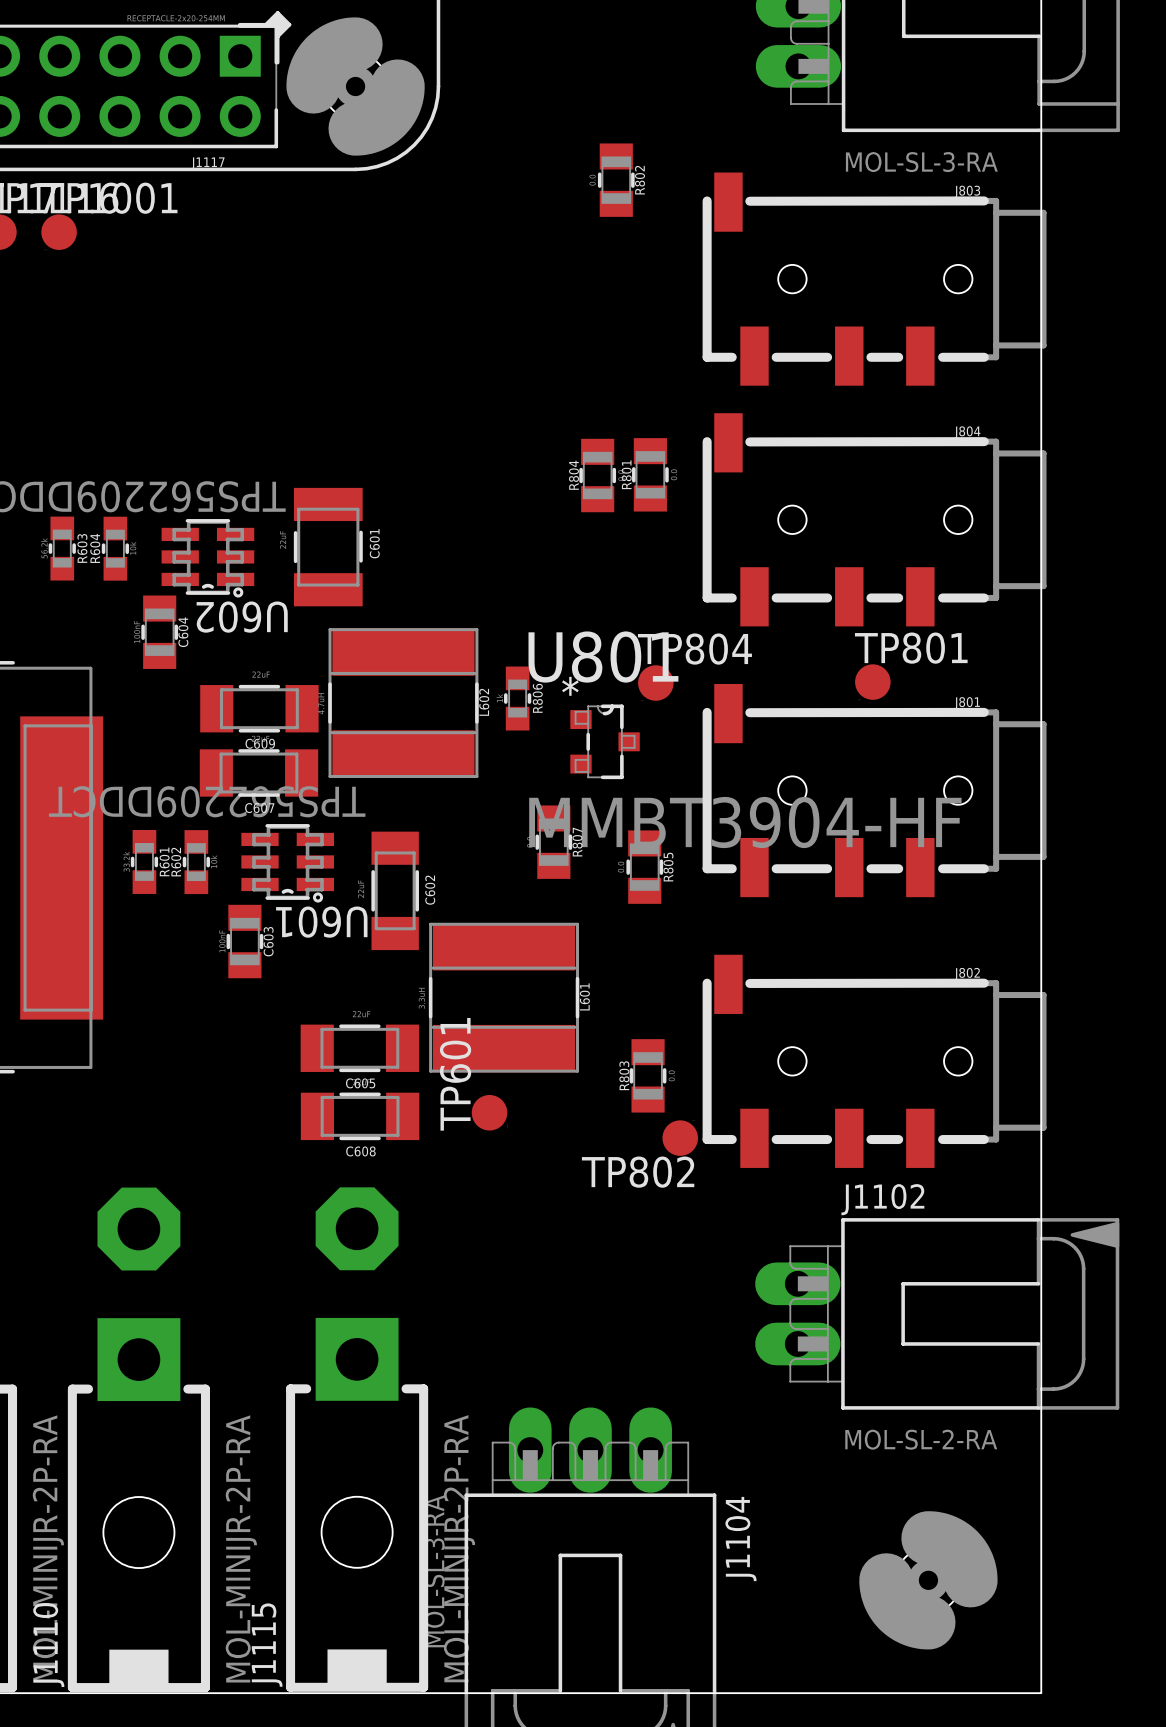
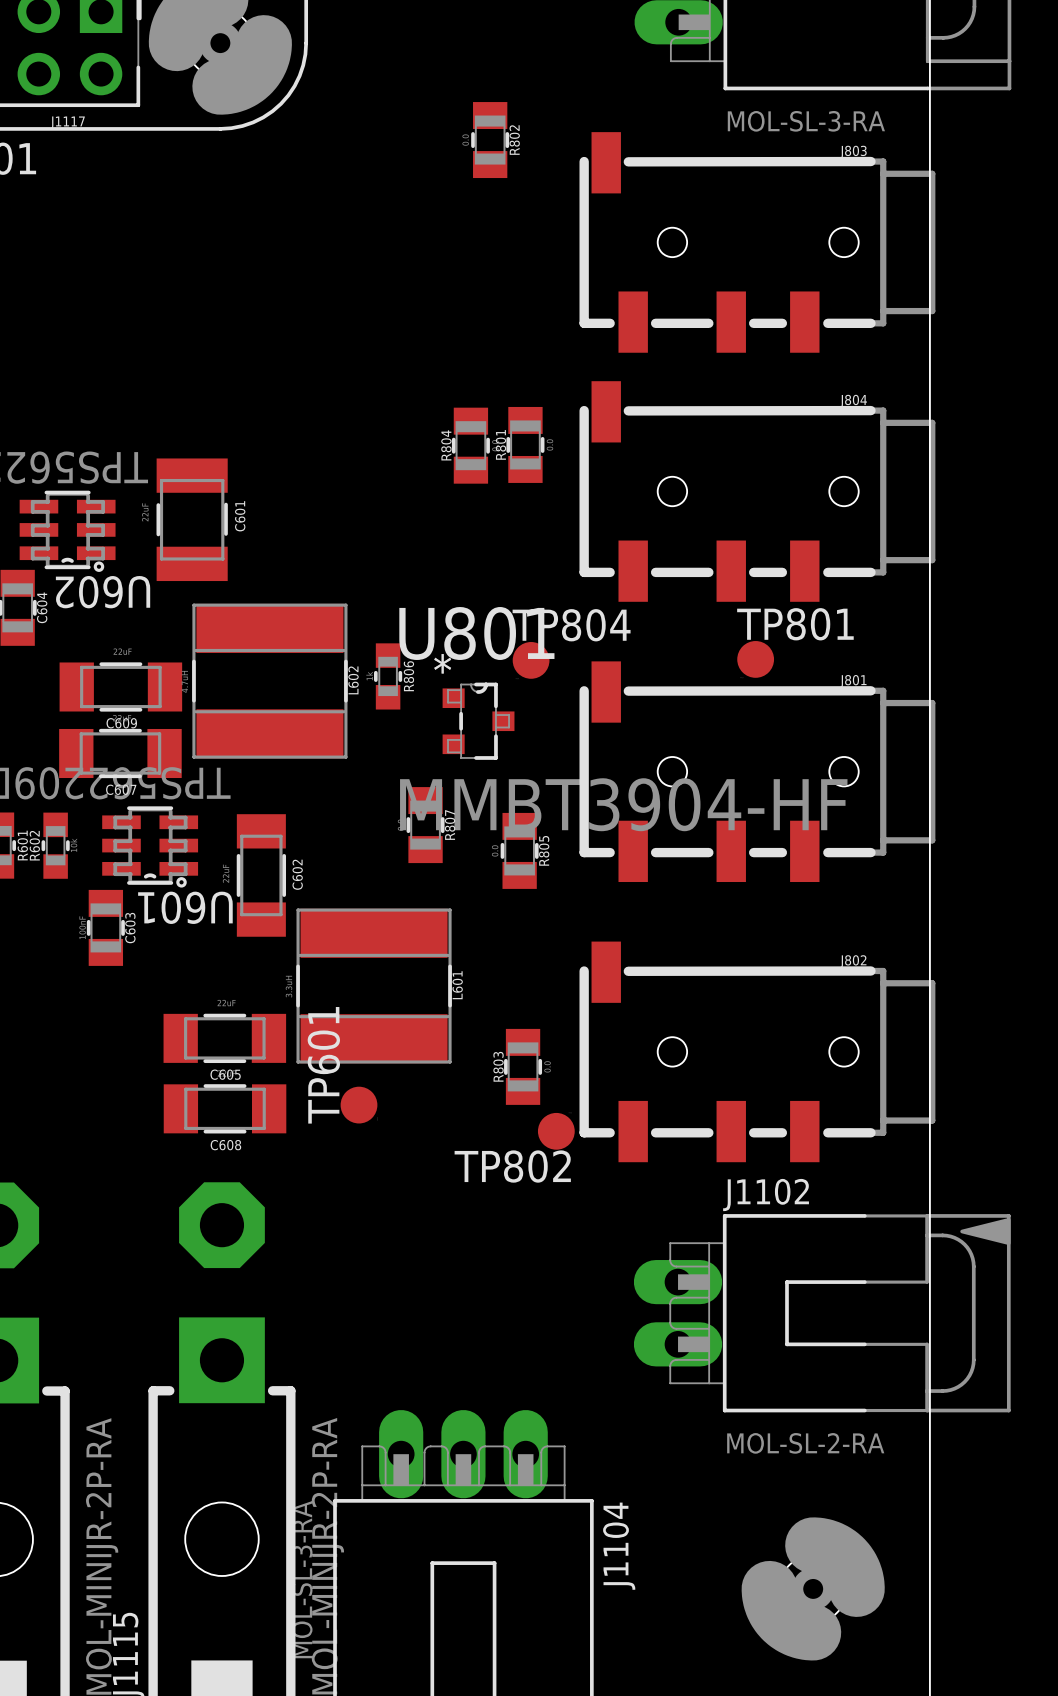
J1102 footprint: [755, 1218, 1120, 1410] -> [633, 1214, 1011, 1413]

